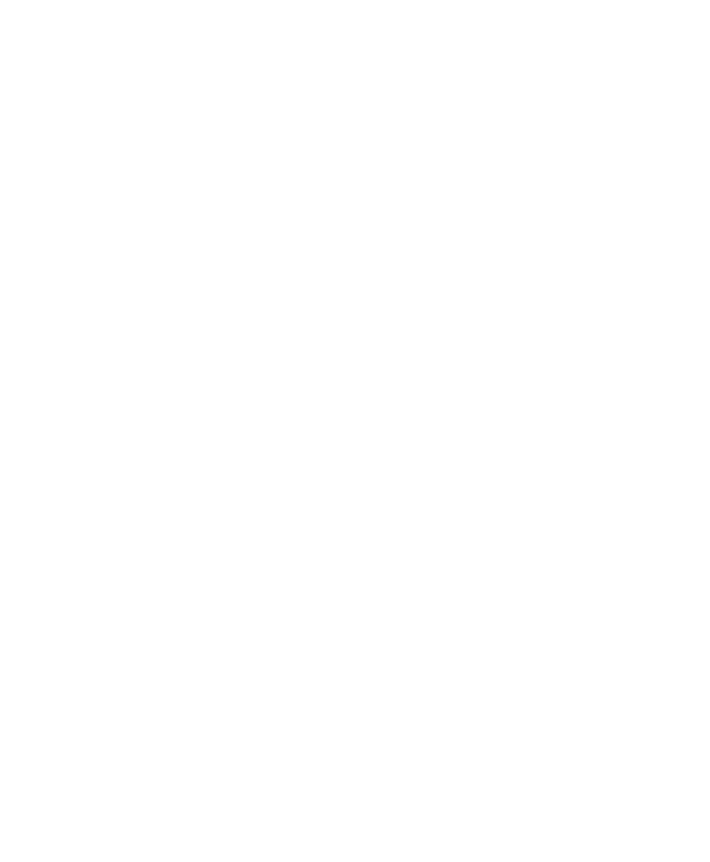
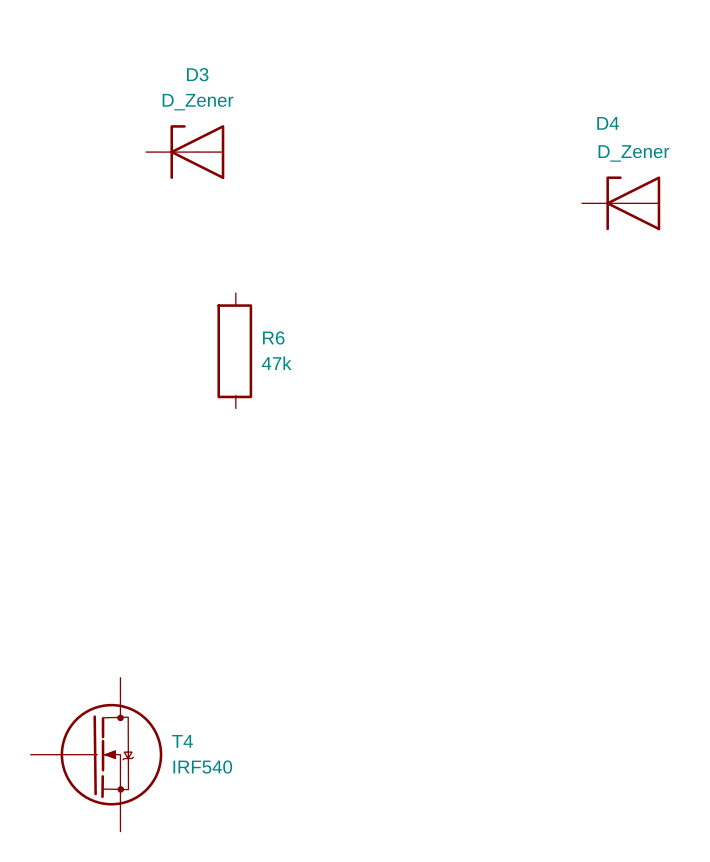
D3: none -> D_Zener (185, 152)
D4: none -> D_Zener (621, 203)
R6: none -> 47k (234, 350)
T4: none -> IRF540 (96, 754)

